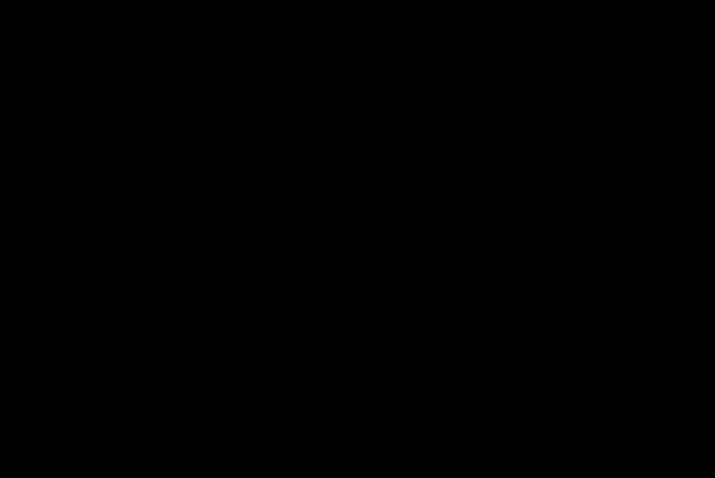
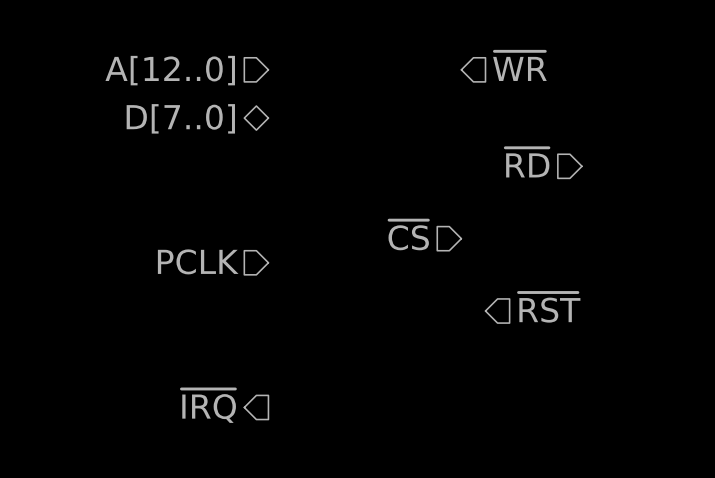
hierarchical label: none -> ~{WR} (519, 66)
hierarchical label: none -> A[12..0] (170, 70)
hierarchical label: none -> D[7..0] (180, 118)
hierarchical label: none -> ~{RD} (527, 162)
hierarchical label: none -> ~{CS} (408, 235)
hierarchical label: none -> PCLK (198, 261)
hierarchical label: none -> ~{RST} (549, 307)
hierarchical label: none -> ~{IRQ} (208, 405)

